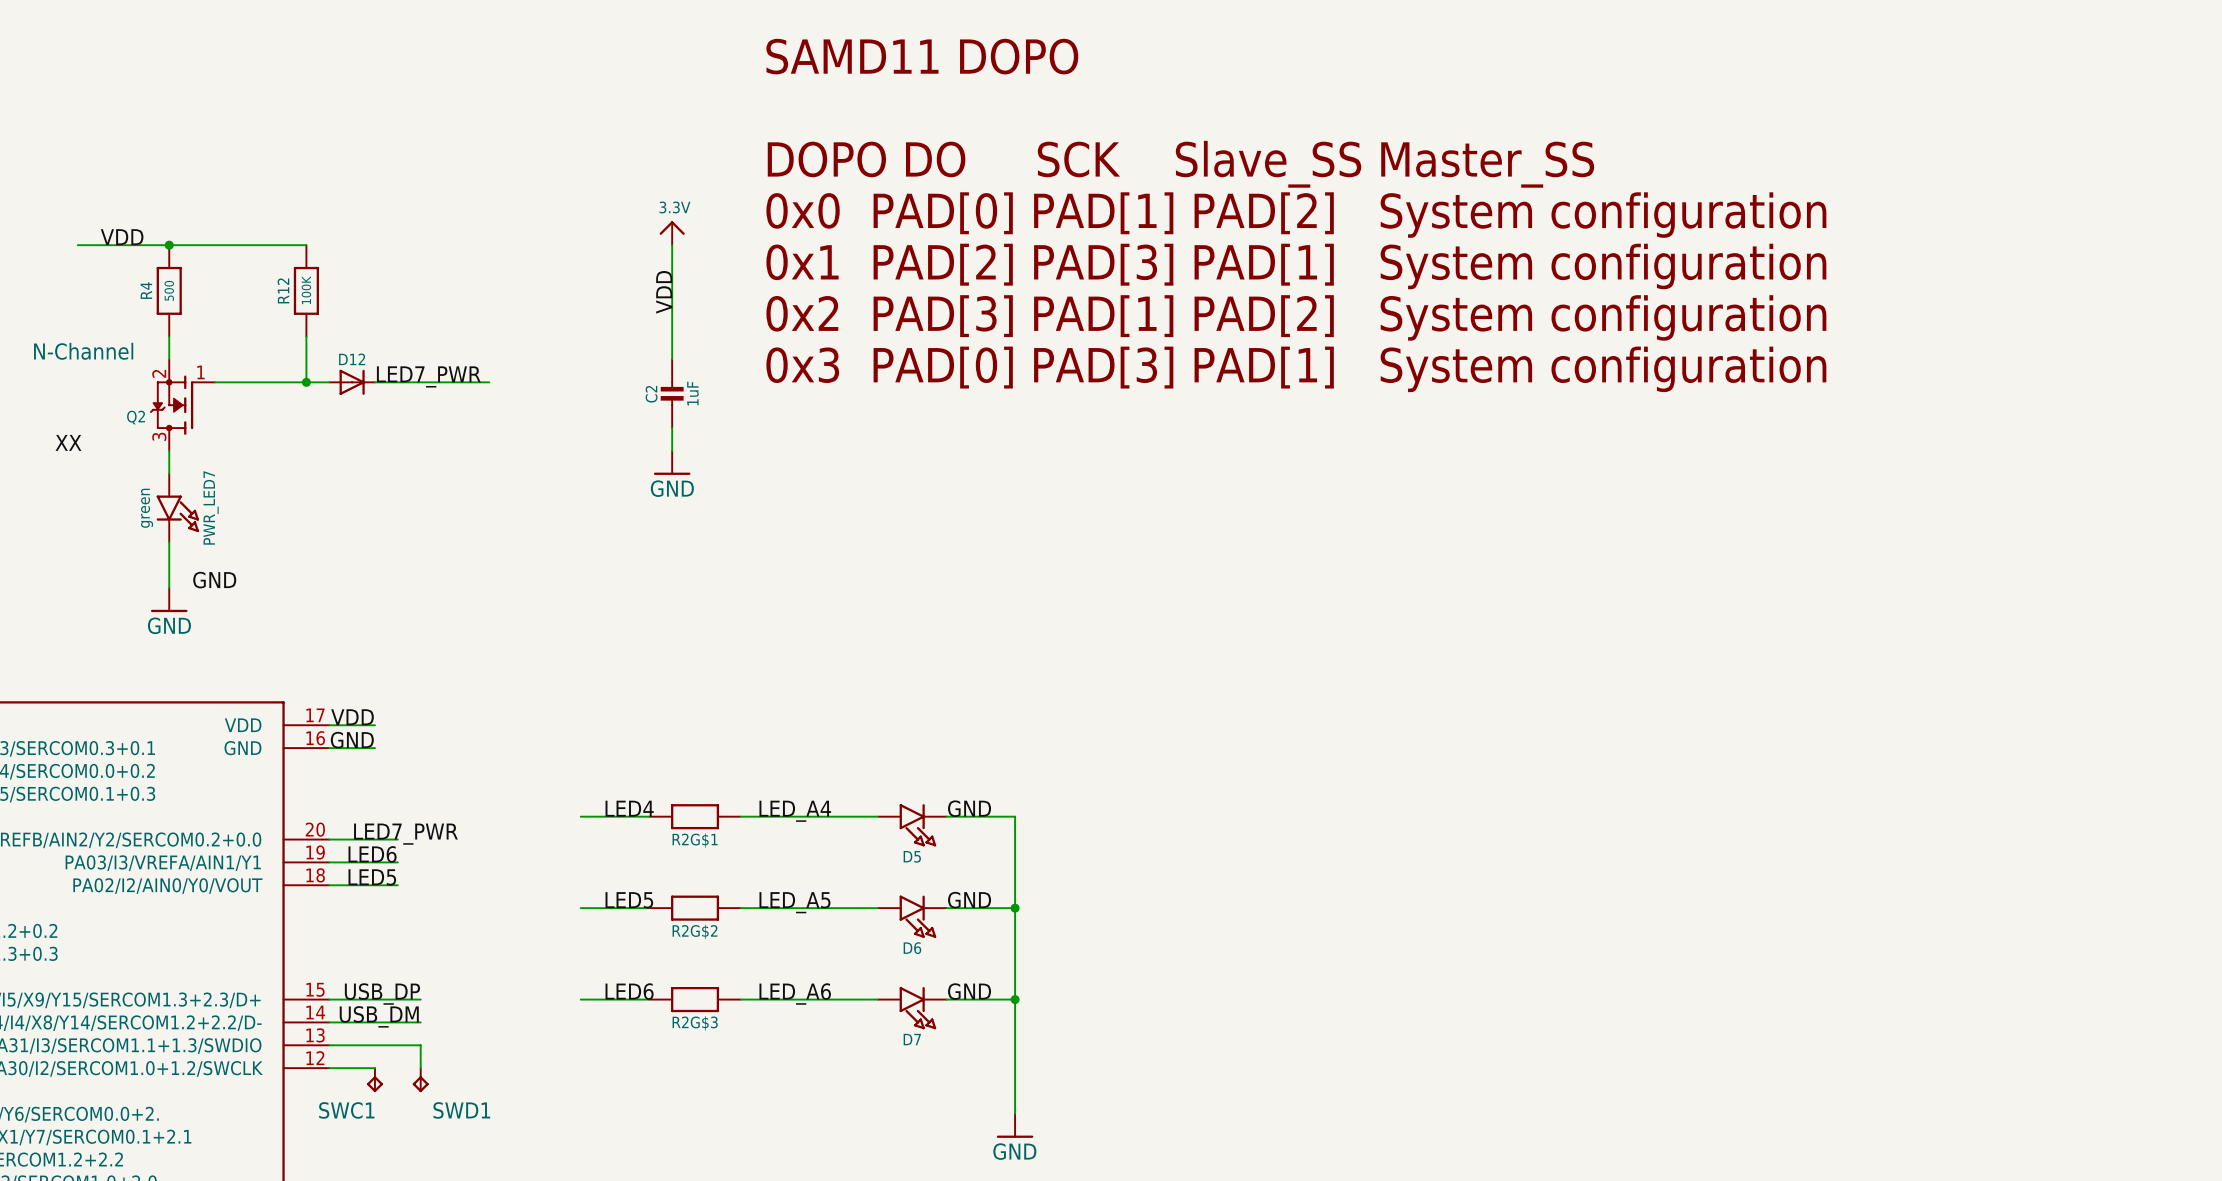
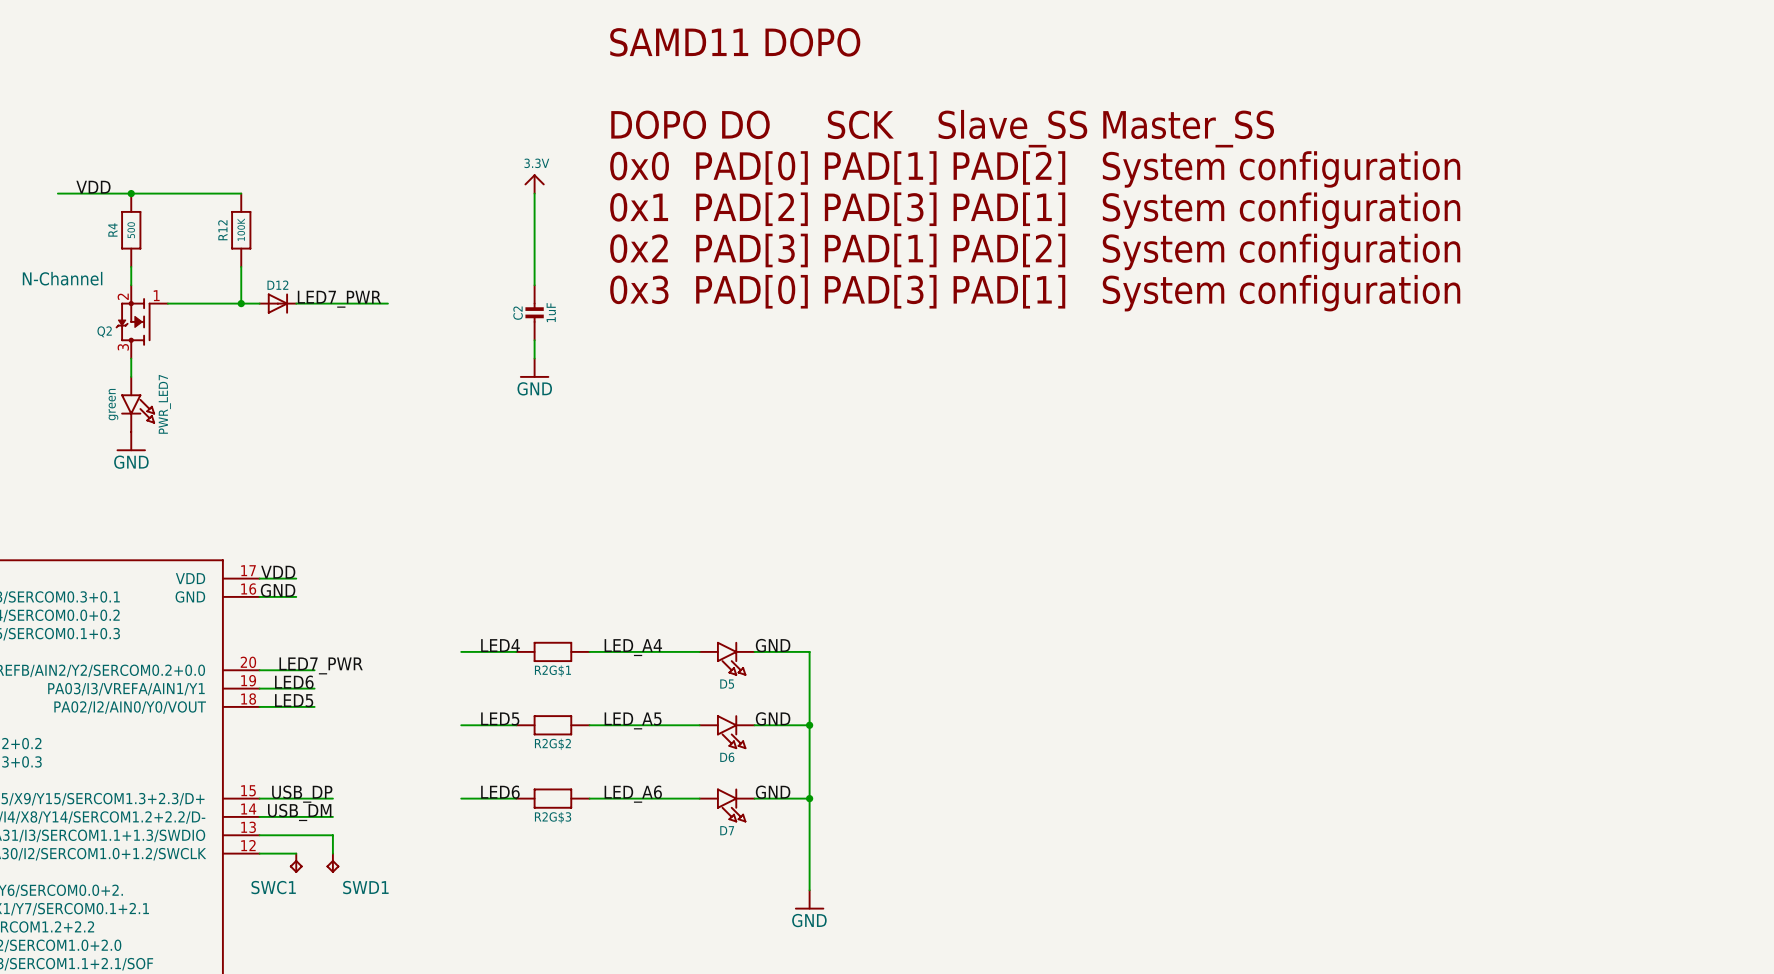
label: VDD (664, 292) -> none
label: XX (68, 442) -> none
label: GND (214, 580) -> none
power symbol position: GND (169, 600) -> GND (131, 441)

